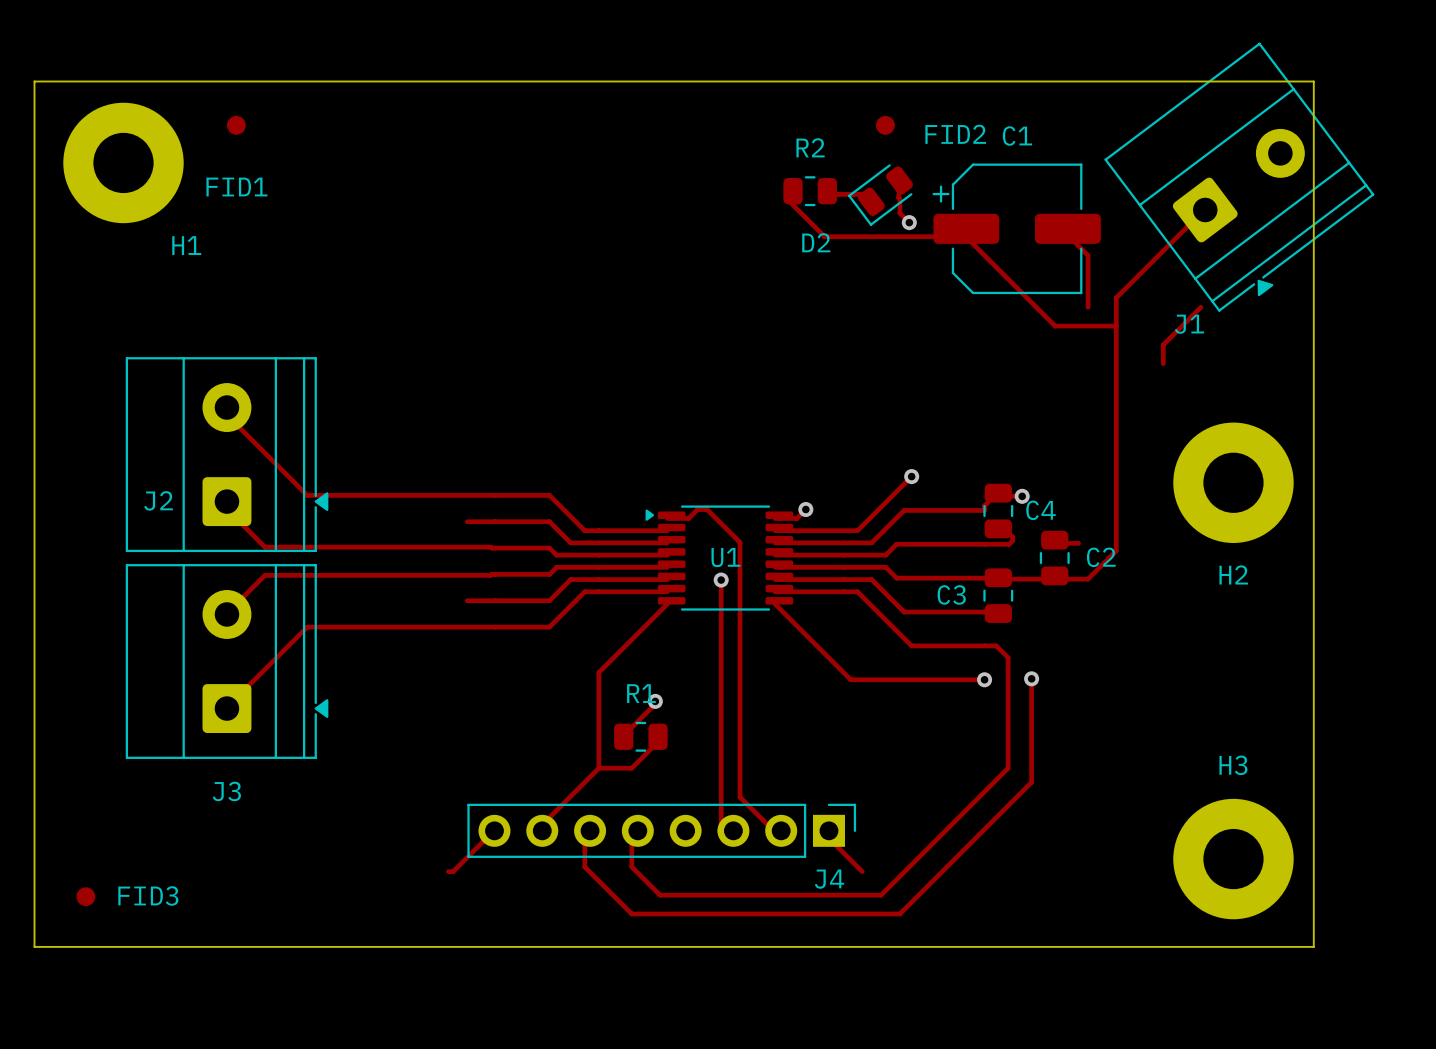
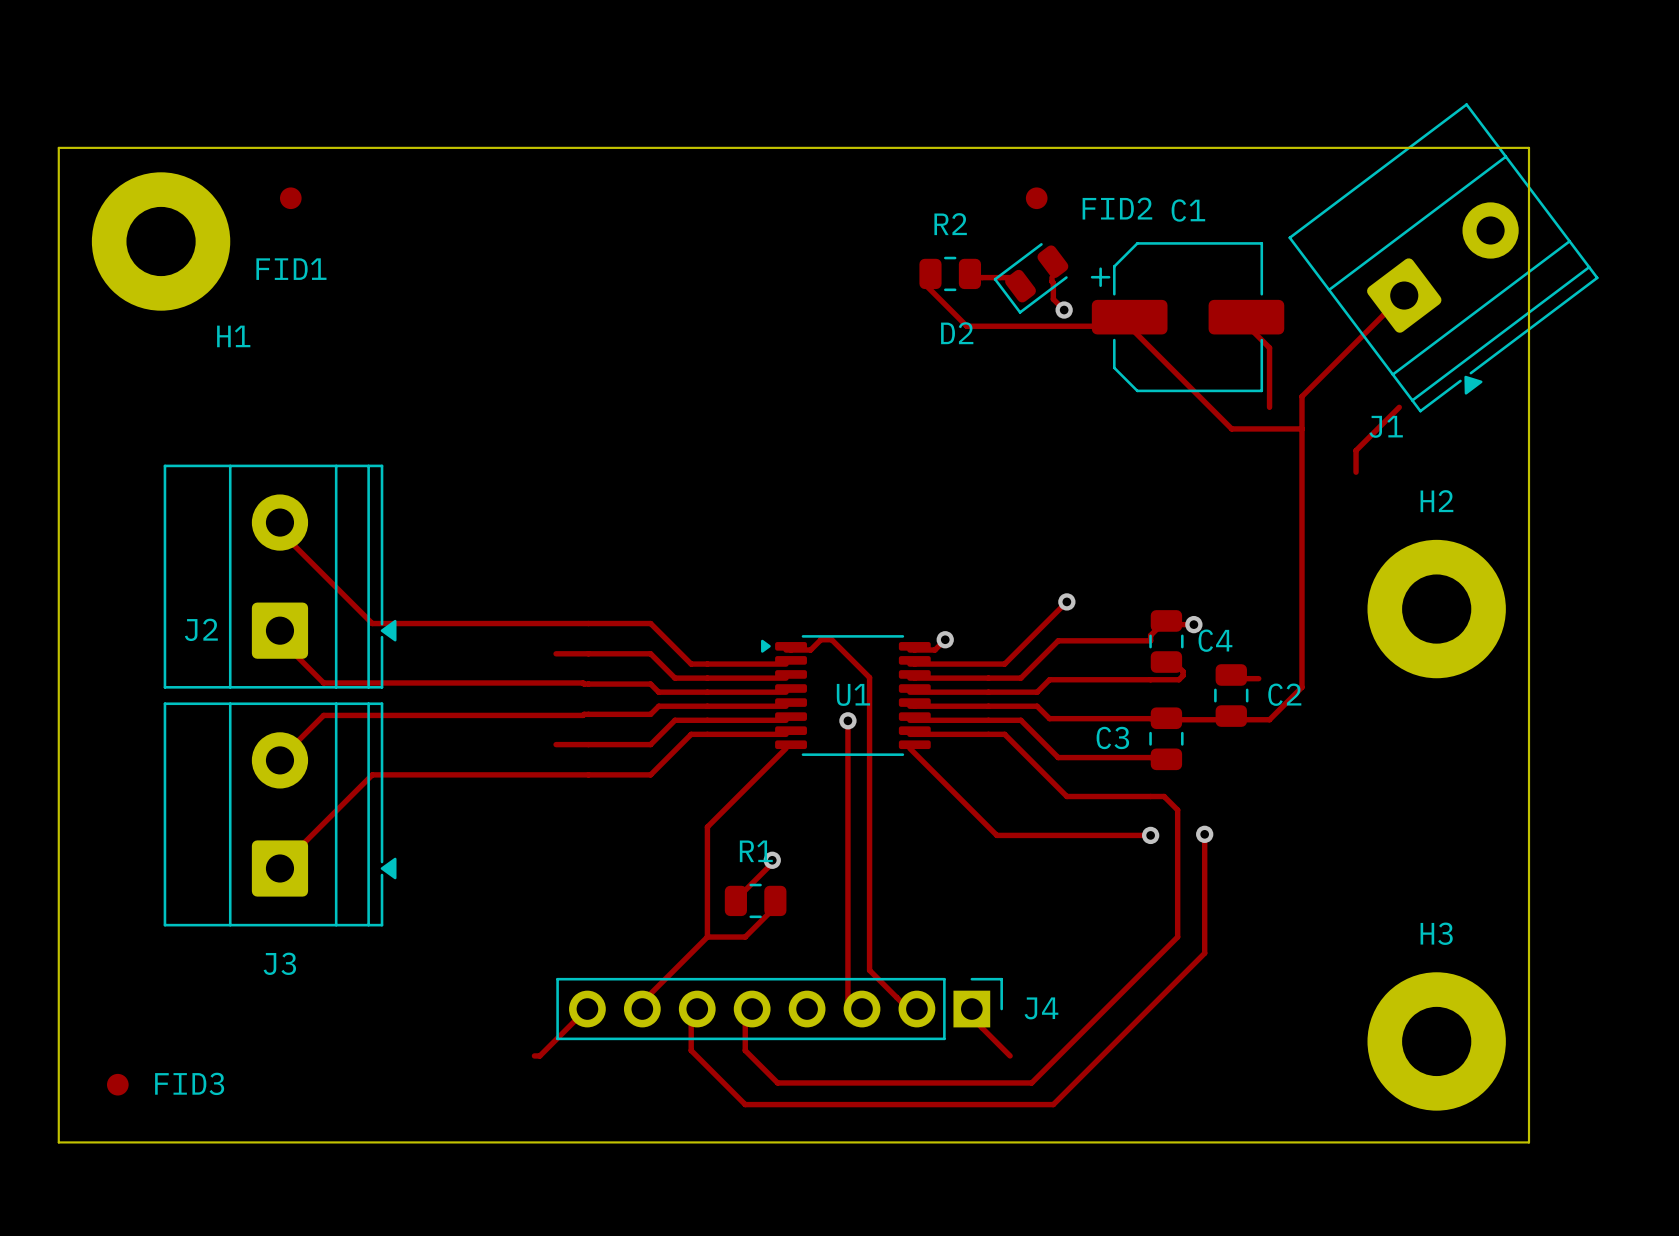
H2 name position: H2 (1233, 574) -> H2 (1436, 501)
J4 name position: J4 (829, 879) -> J4 (1041, 1008)

